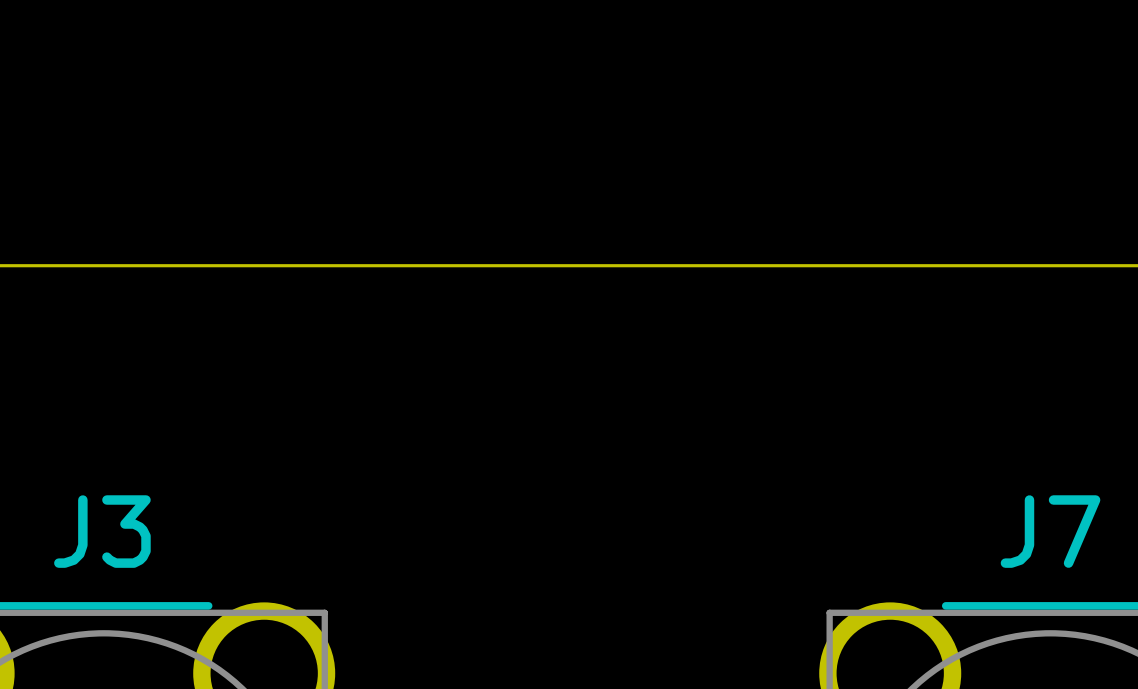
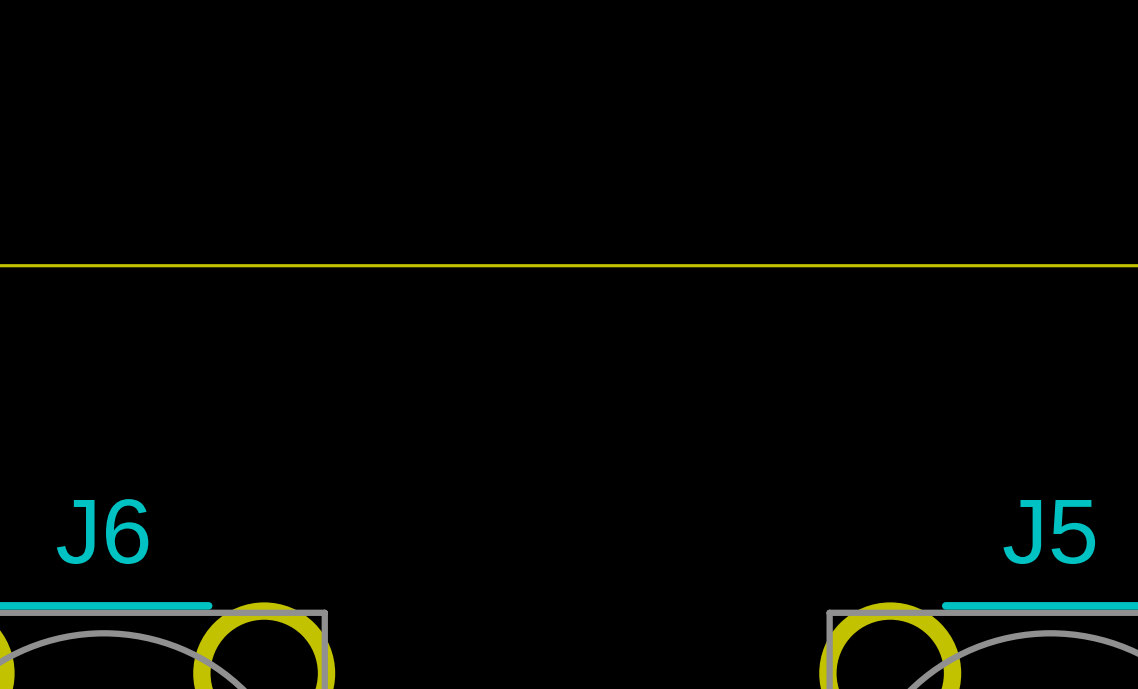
J3 name: J3 (102, 531) -> J6 (102, 531)
J7 name: J7 (1050, 531) -> J5 (1049, 532)

